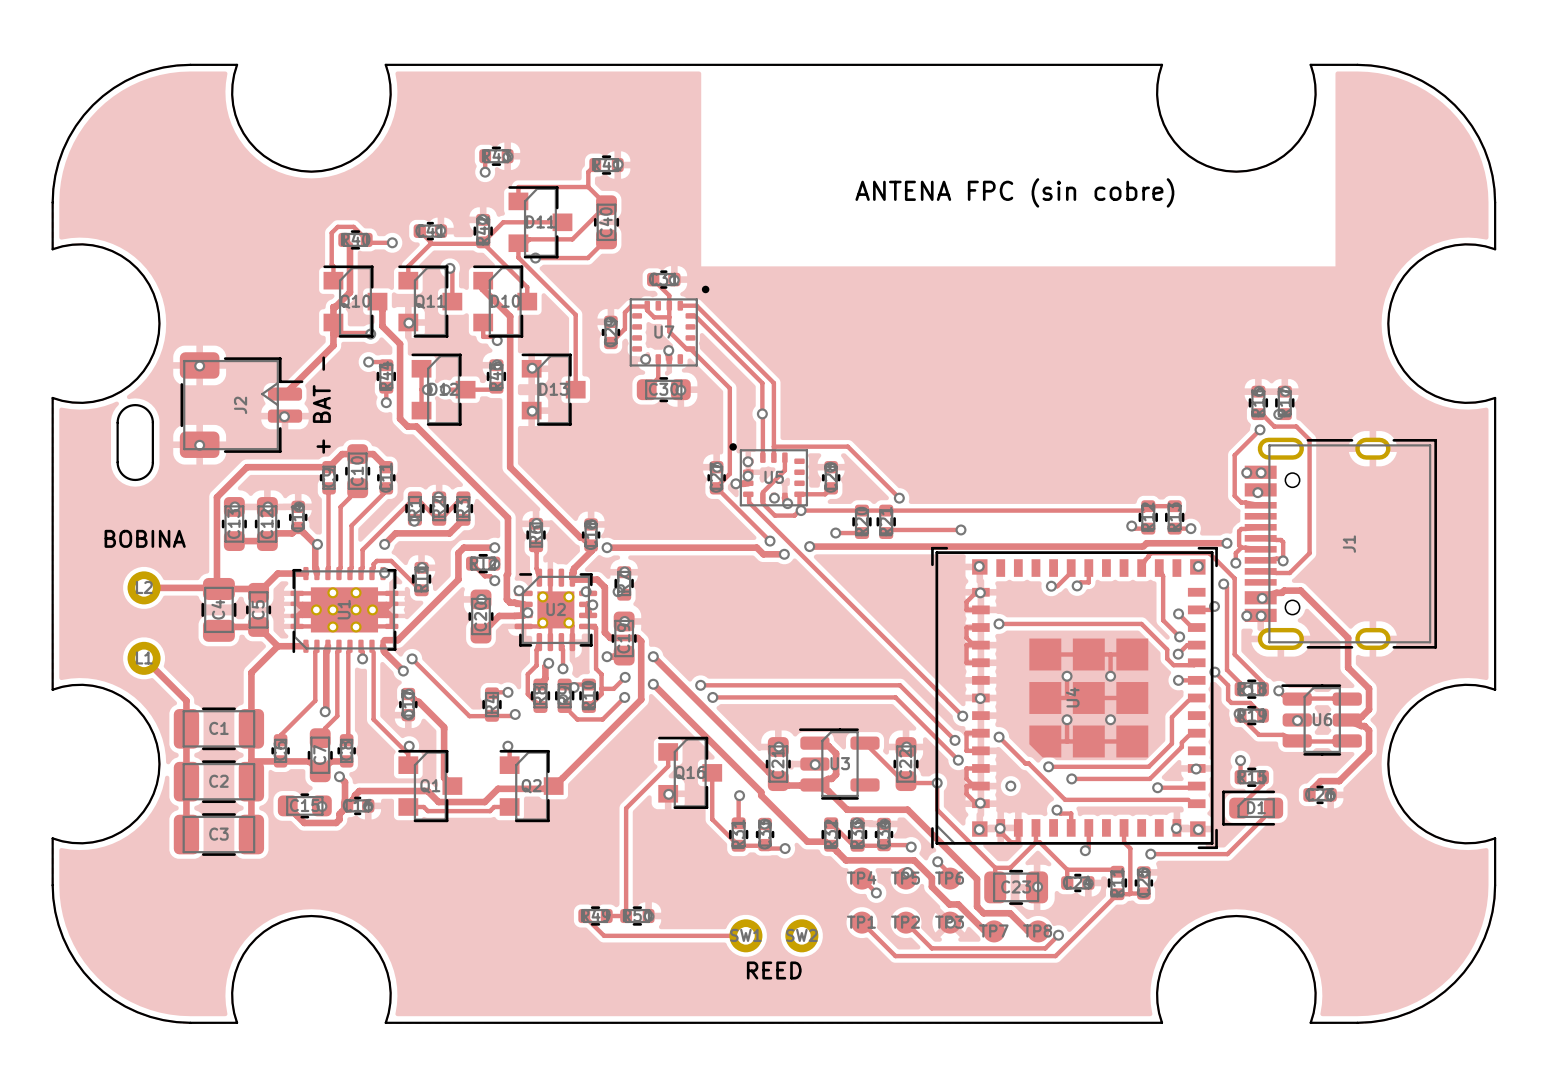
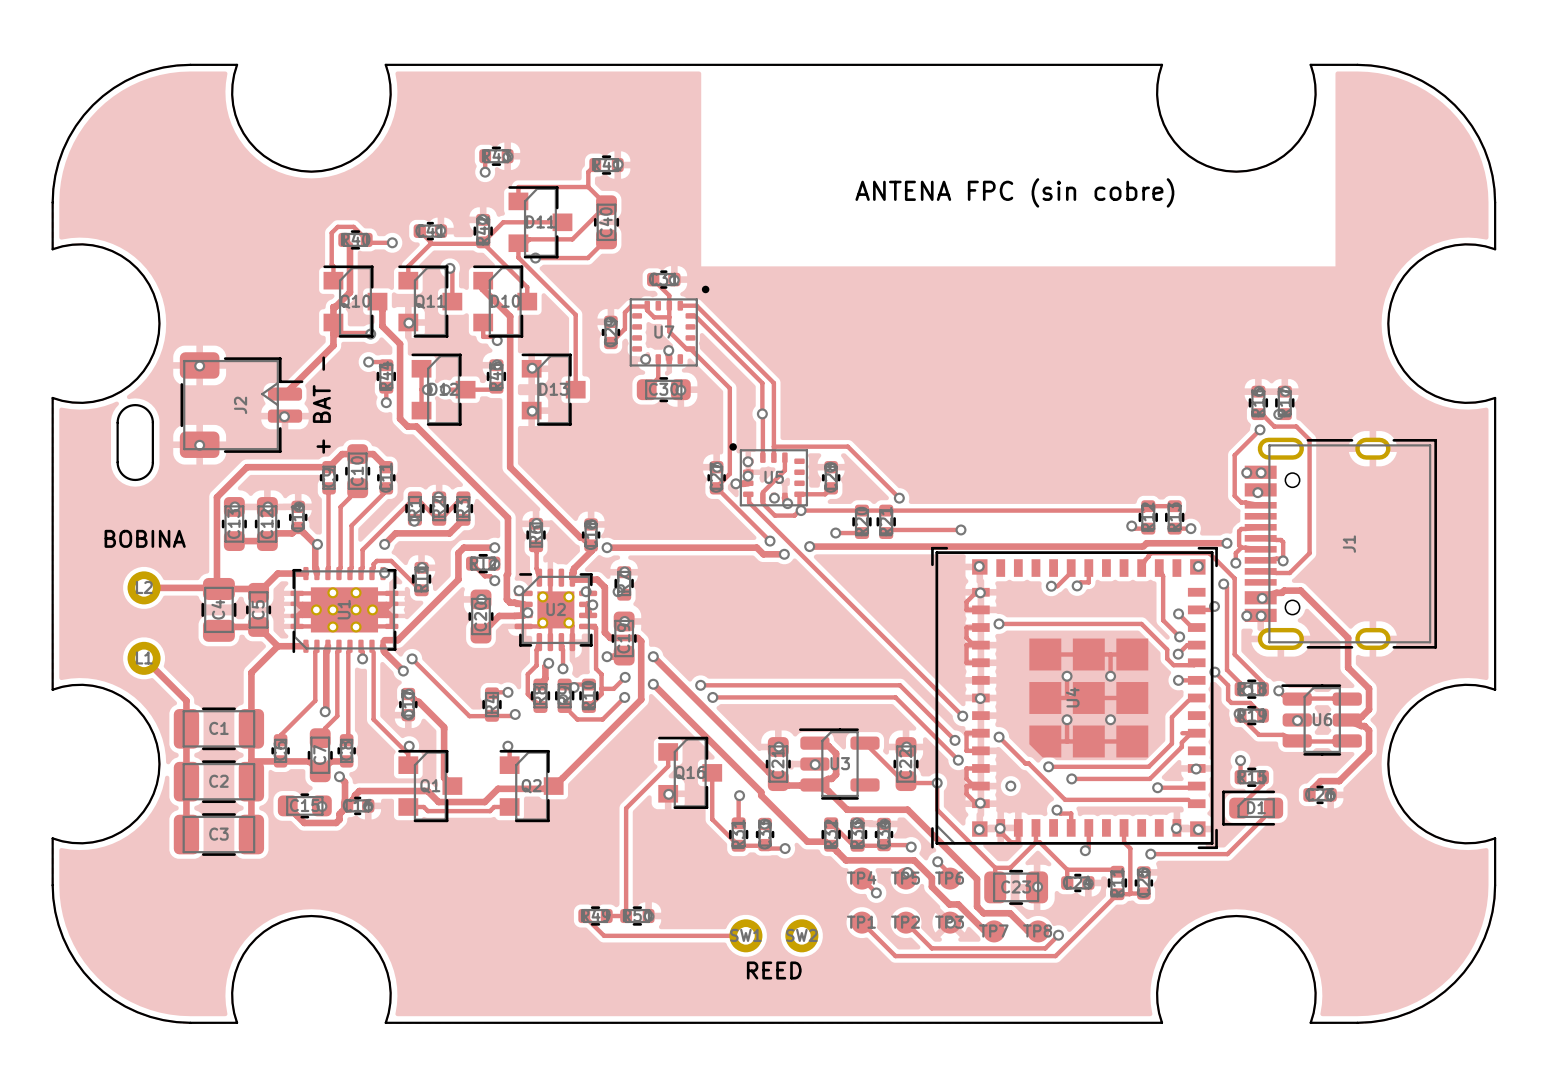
track: none -> (1182, 733) (1196, 733)

